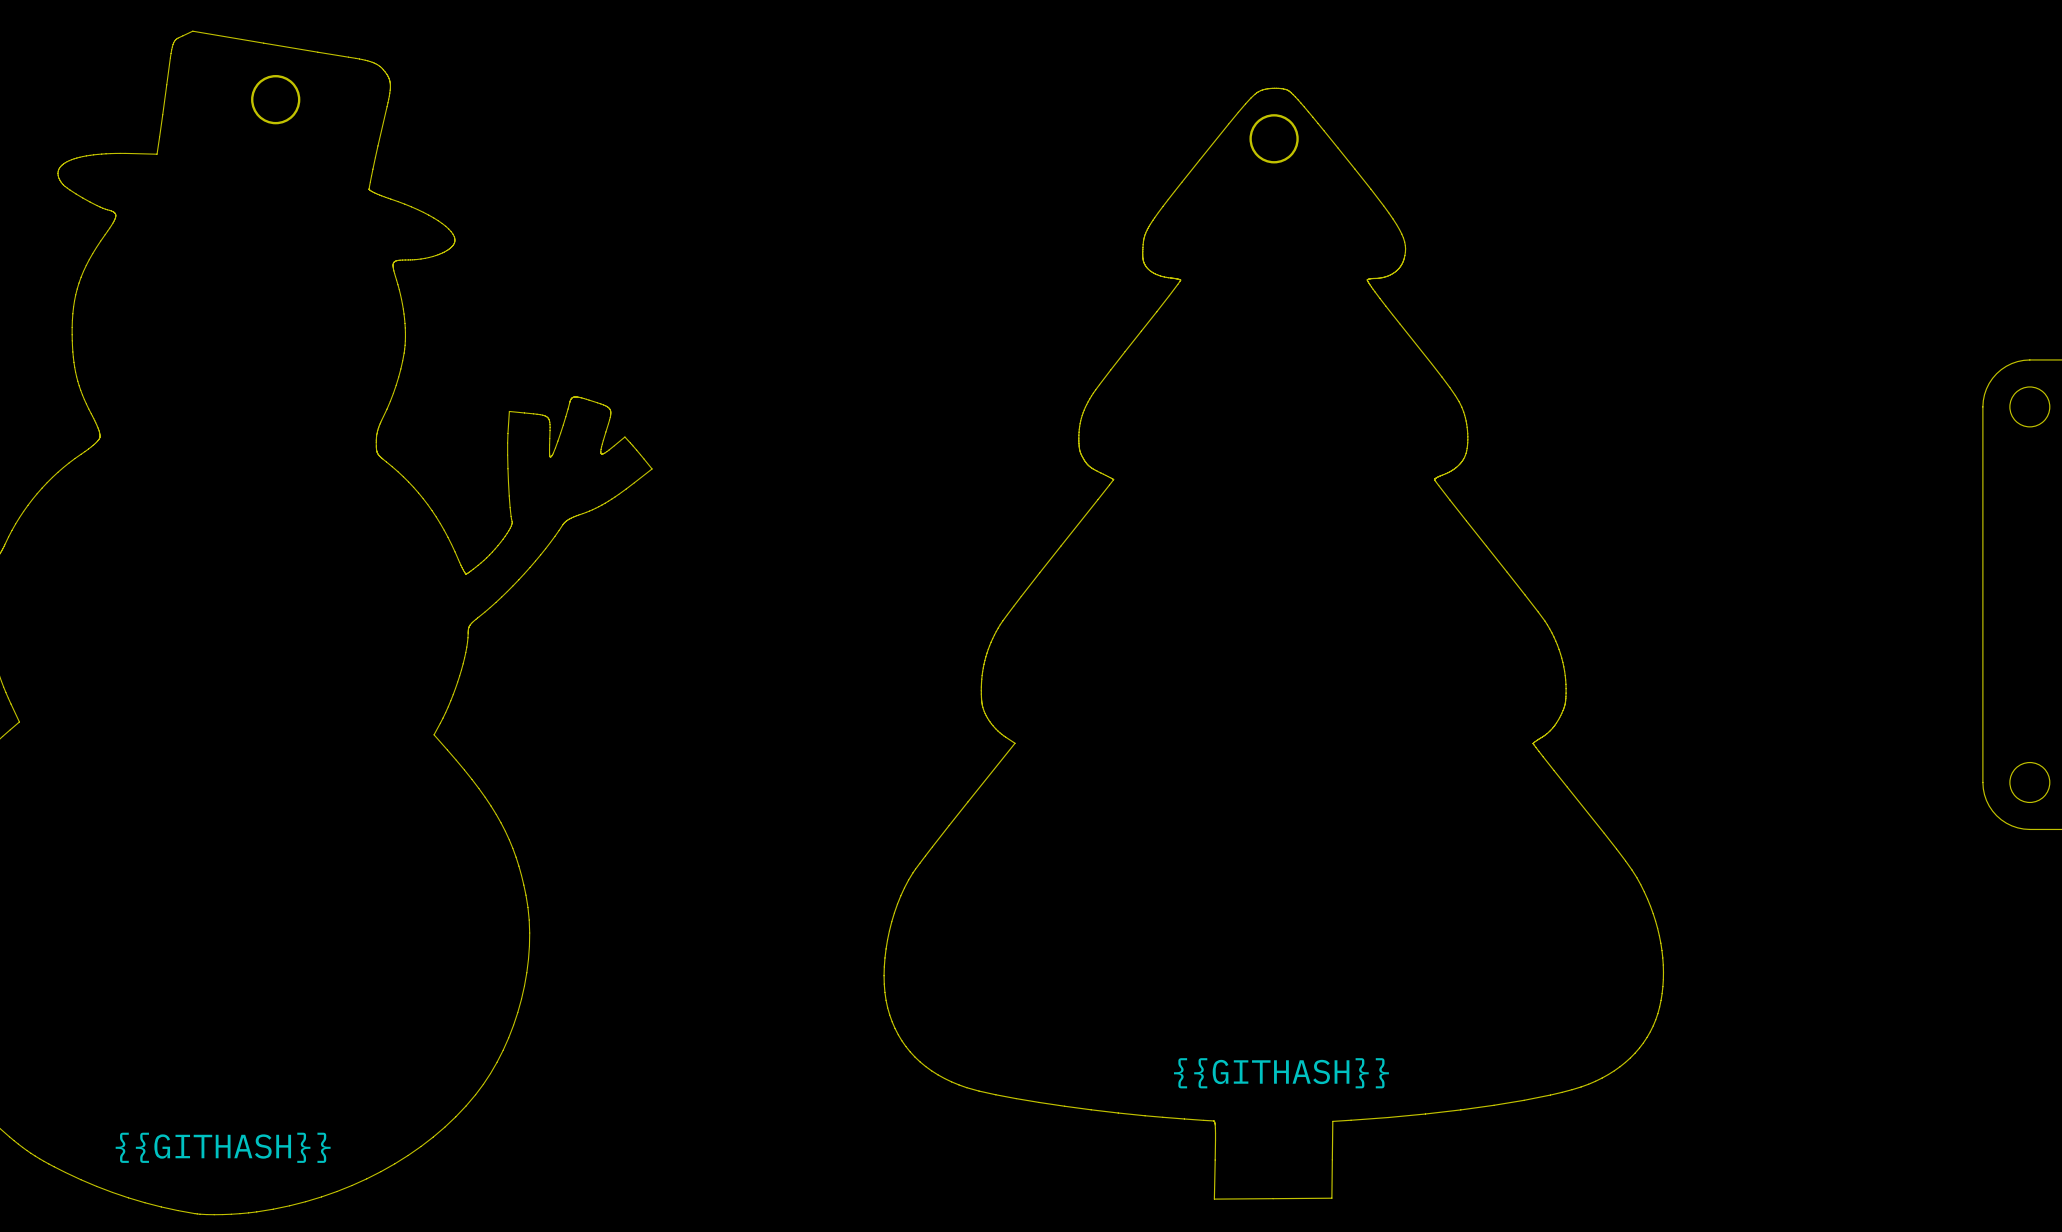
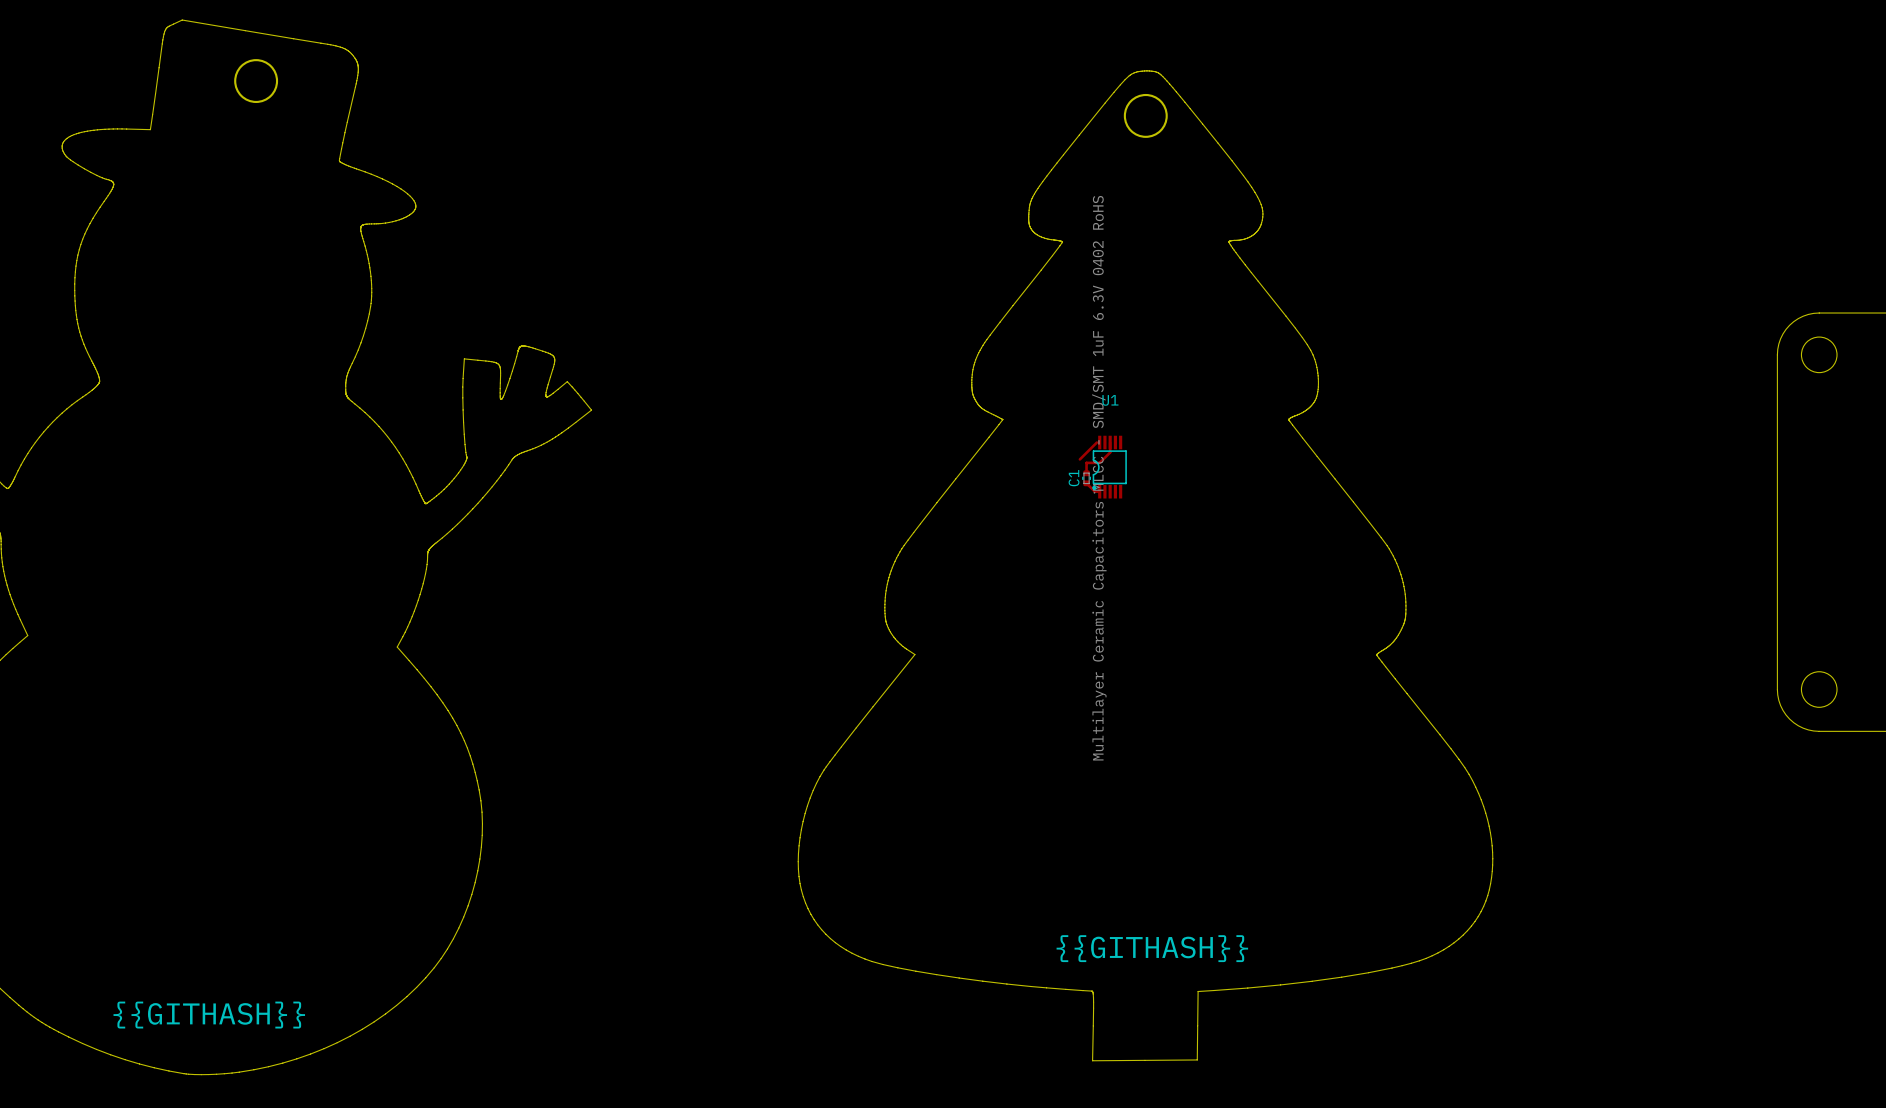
track: none -> (1096, 442) (1079, 459)
track: none -> (1110, 442) (1110, 452) (1099, 462) (1086, 462) (1086, 473)
U1: none -> (1109, 467)
C1: none -> Multilayer Ceramic Capacitors MLCC - SMD/SMT 1uF 6.3V 0402 RoHS (1086, 478)
track: none -> (1086, 483) (1094, 491) (1099, 491)

